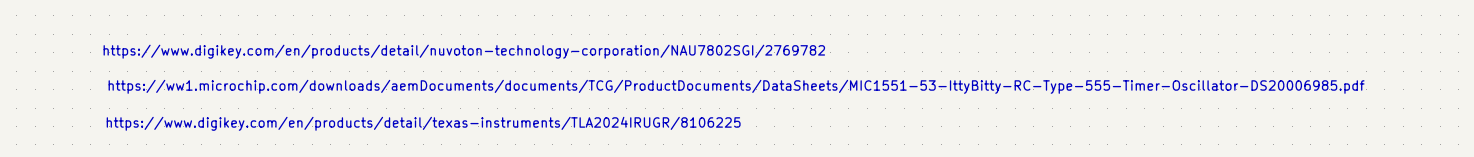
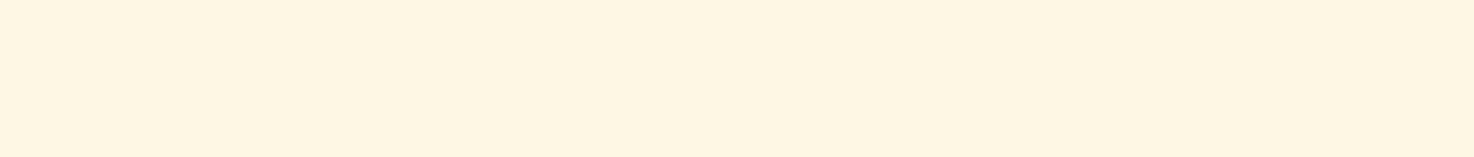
text: https://www.digikey.com/en/products/detail/nuvoton-technology-corporation/NAU7802SGI/2769782 (464, 51) -> none
text: https://ww1.microchip.com/downloads/aemDocuments/documents/TCG/ProductDocuments/DataSheets/MIC1551-53-IttyBitty-RC-Type-555-Timer-Oscillator-DS20006985.pdf (736, 86) -> none
text: https://www.digikey.com/en/products/detail/texas-instruments/TLA2024IRUGR/8106225 (423, 123) -> none

